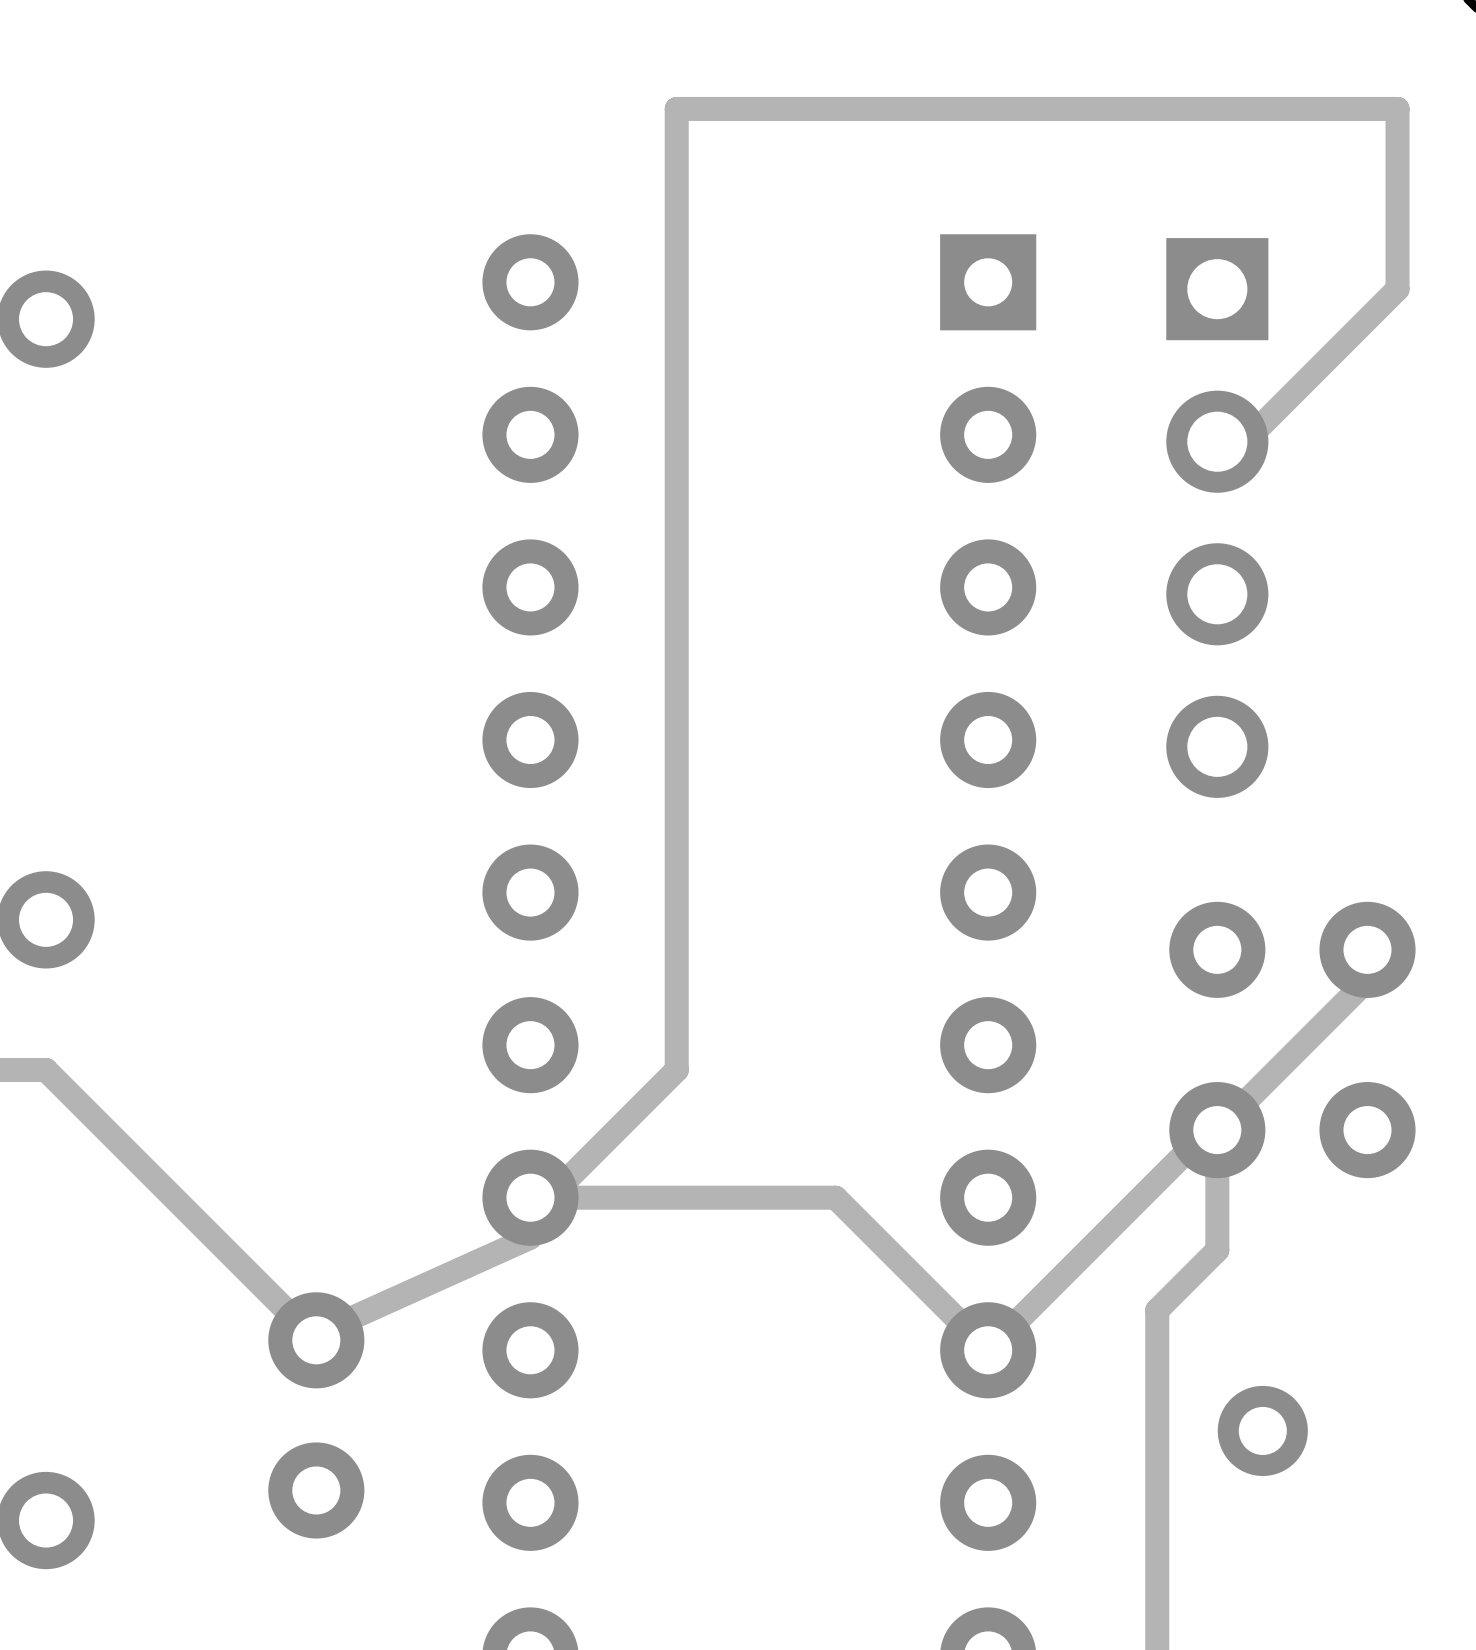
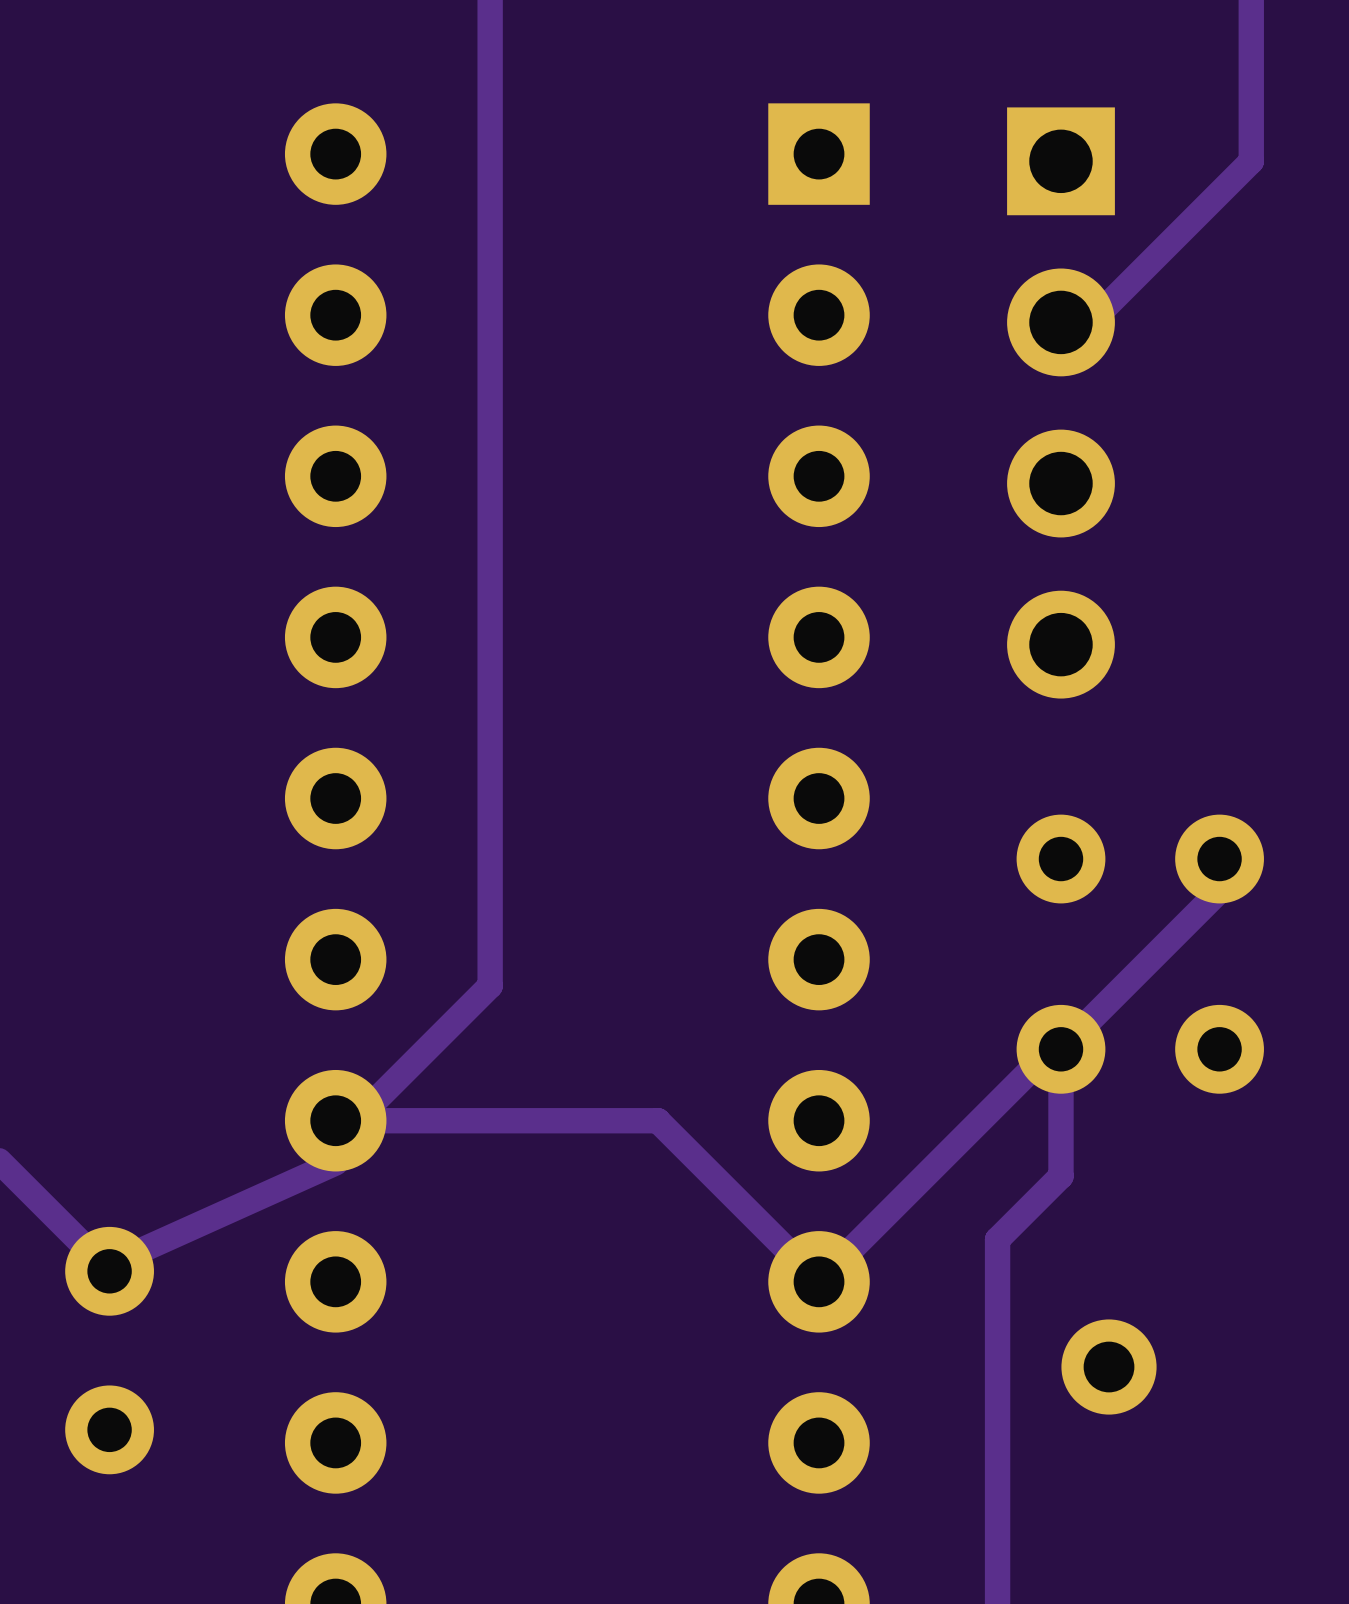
part footprint: [1169, 901, 1416, 998] -> [1016, 814, 1264, 904]
part footprint: [1169, 1082, 1416, 1179] -> [1016, 1004, 1264, 1094]
part footprint: [268, 1292, 365, 1539] -> [65, 1226, 154, 1475]

